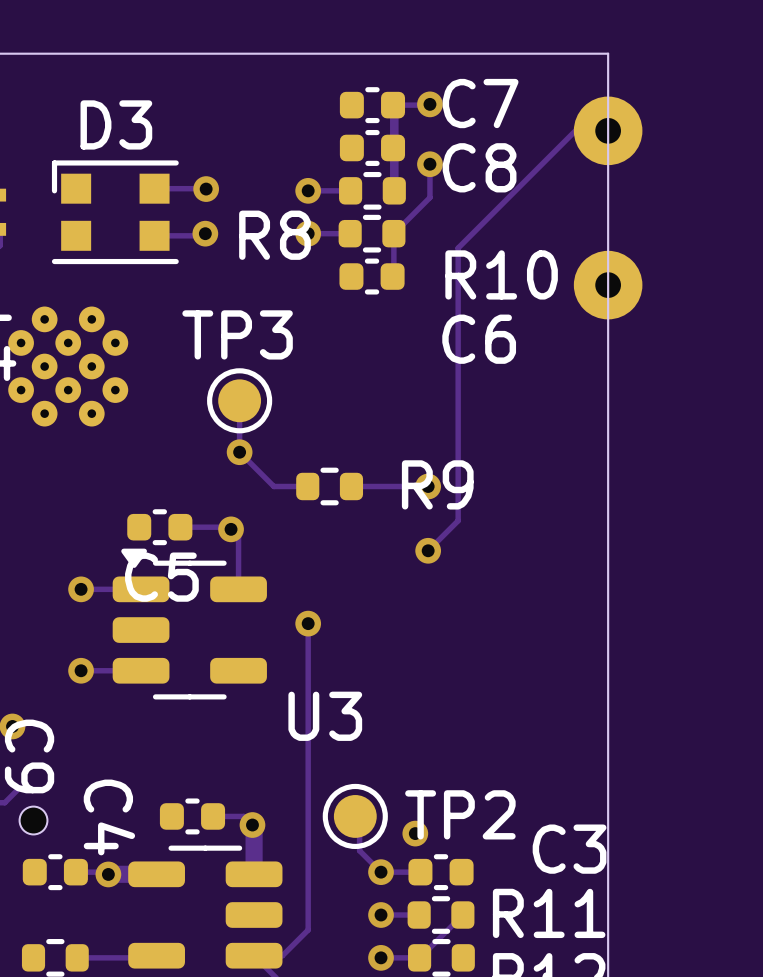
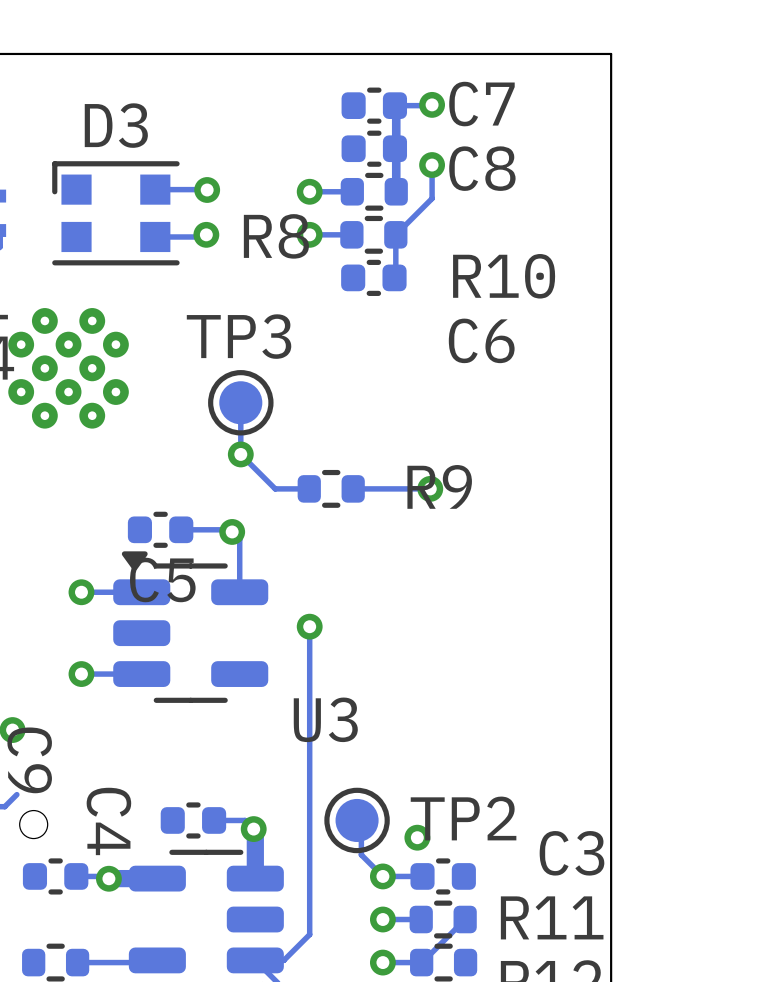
track: (583, 122) (458, 248) (458, 520) (428, 550) -> none
part: (608, 207) -> none
via: (428, 550) -> none

